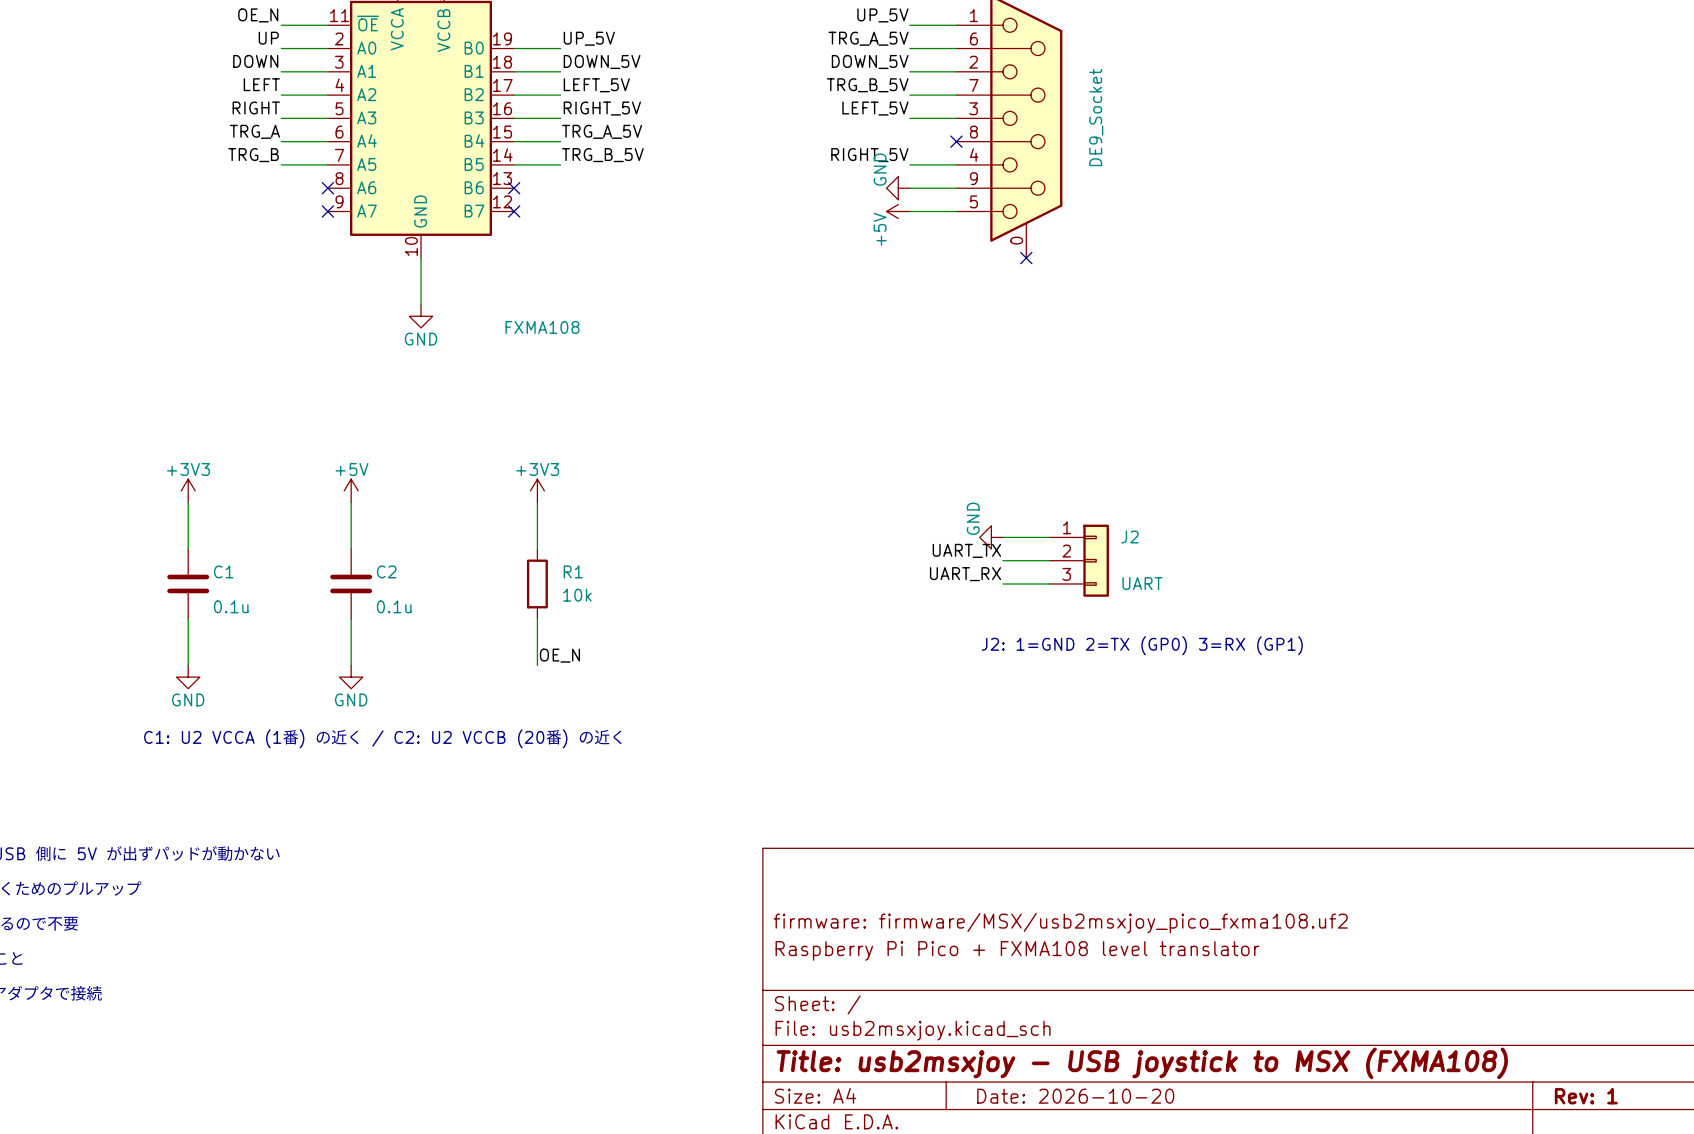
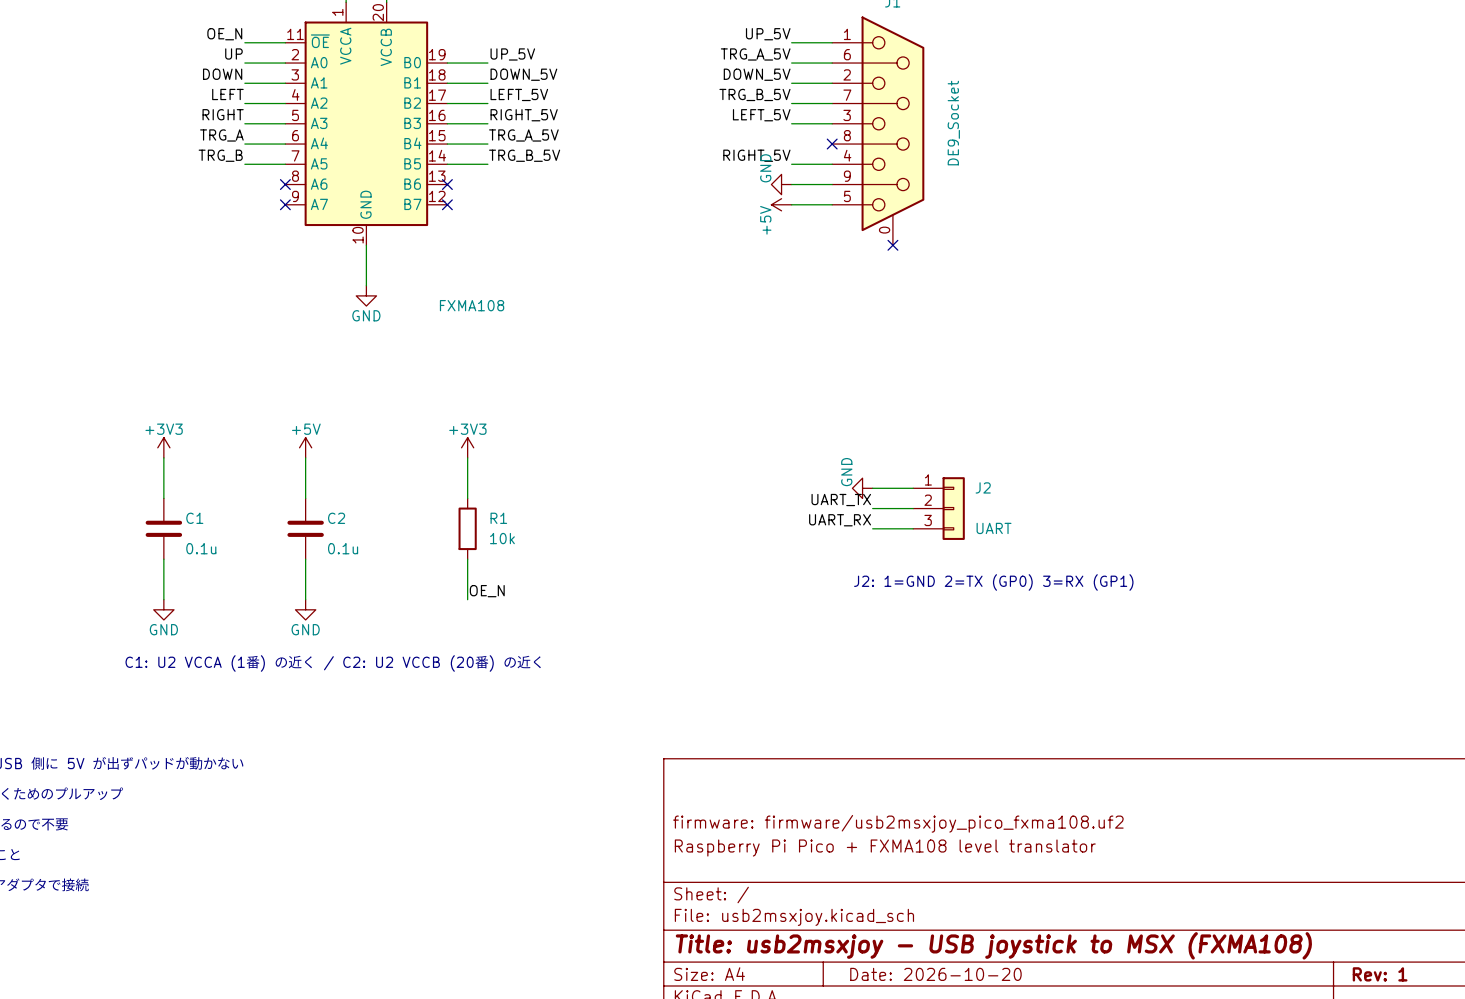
title block: firmware: firmware/MSX/usb2msxjoy_pico_fxma108.uf2 (1060, 923) -> firmware: firmware/usb2msxjoy_pico_fxma108.uf2 (898, 823)

